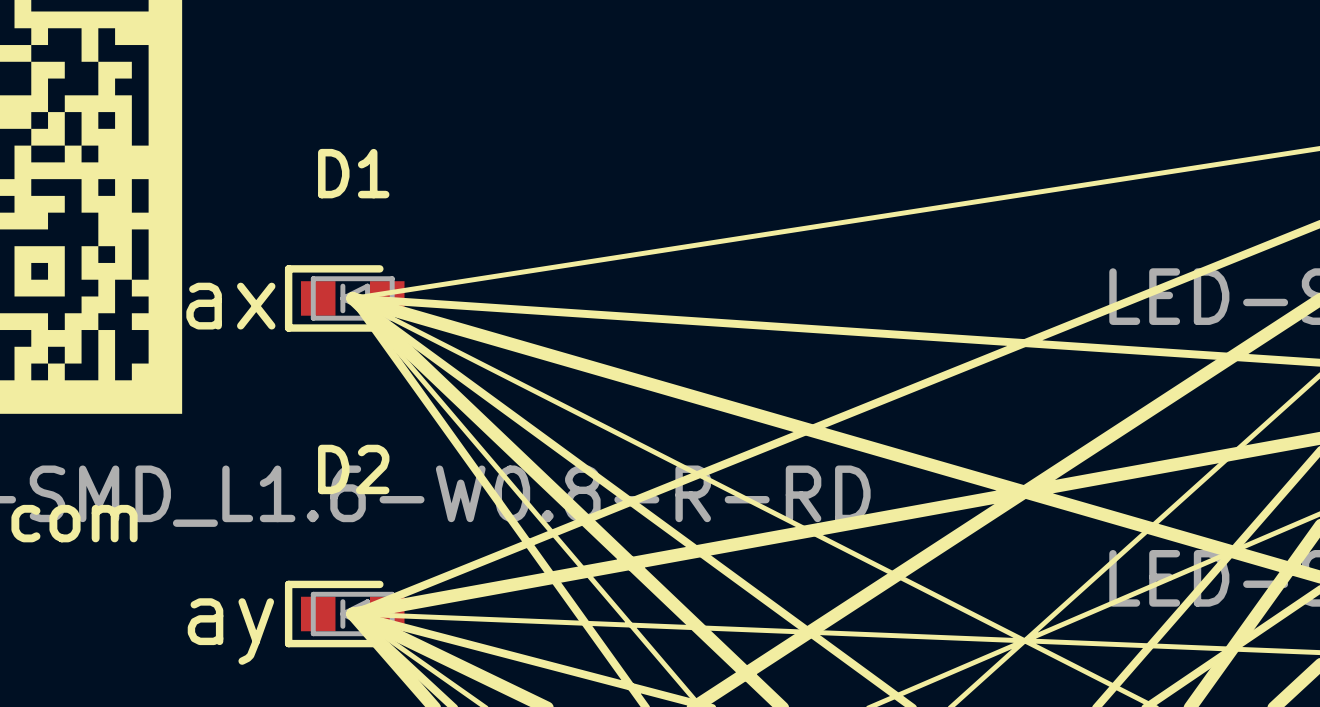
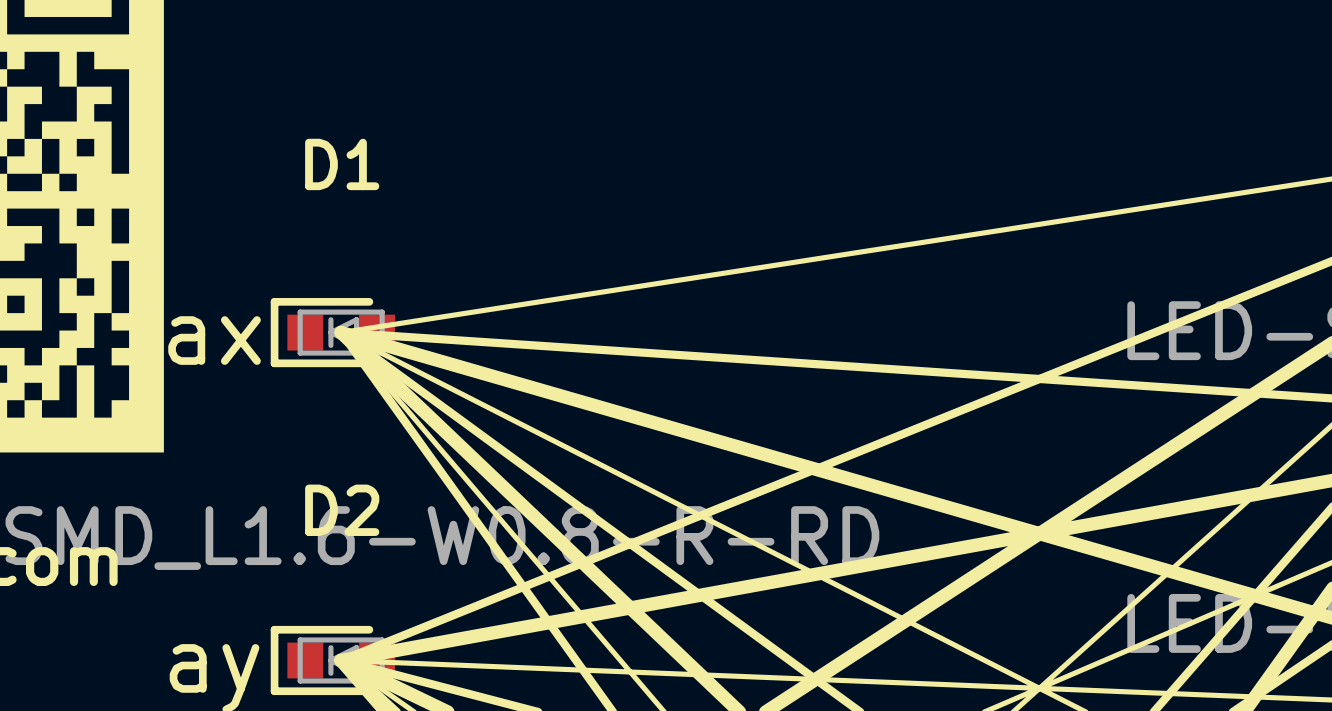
D1 name position: D1 (353, 173) -> D1 (342, 164)

